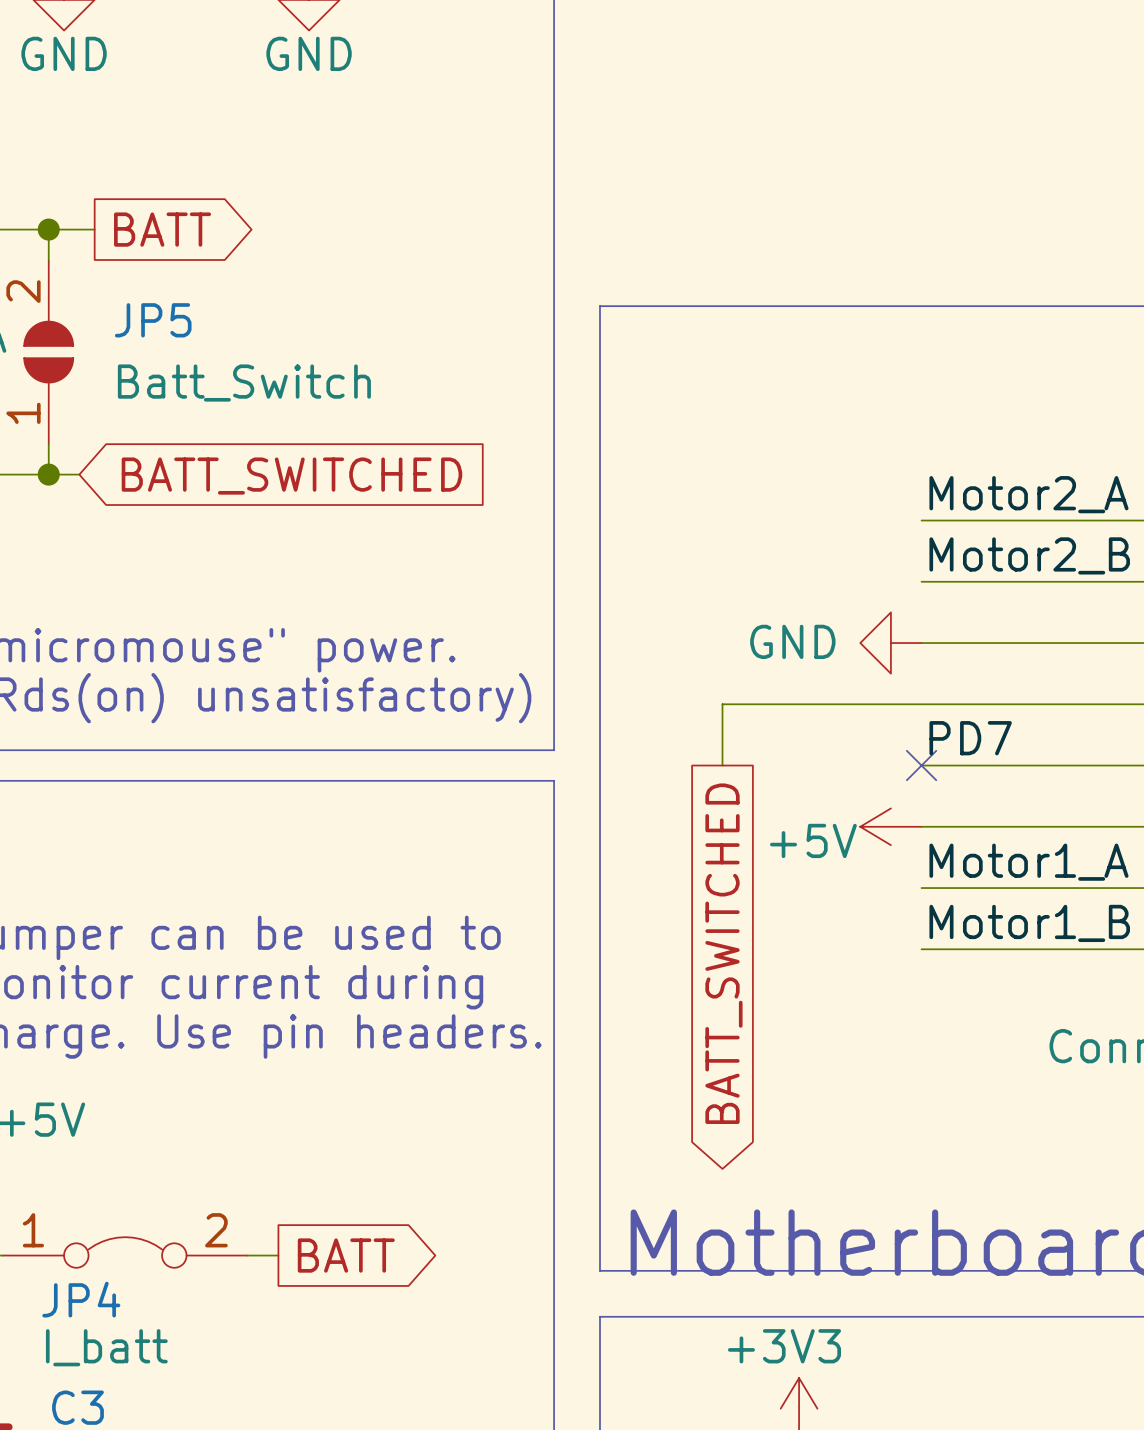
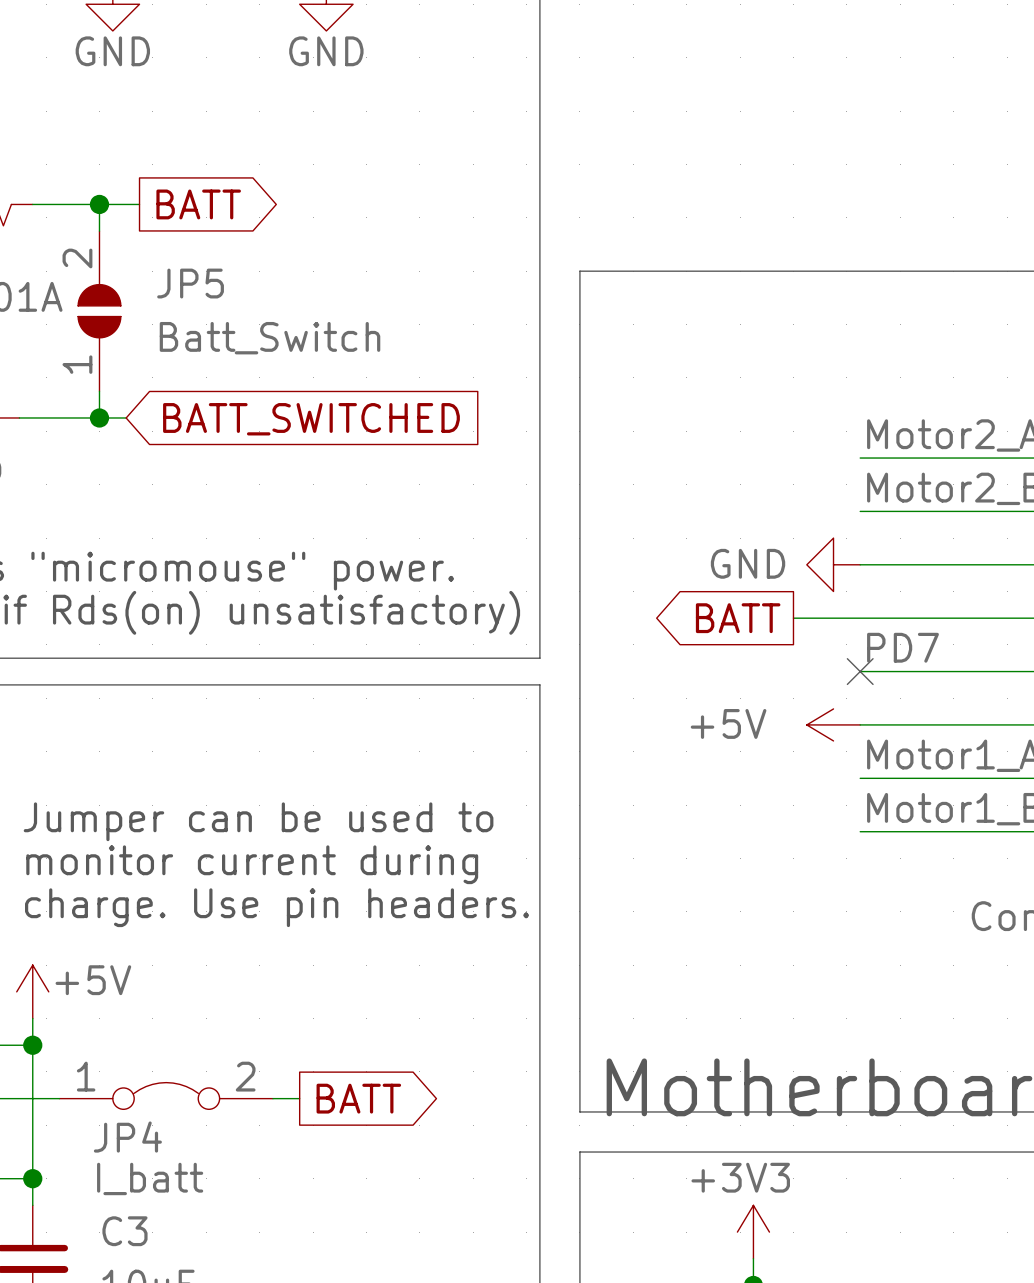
global label: none -> BATT (738, 618)
wire: (845, 704) (722, 704) (722, 765) -> none
power symbol text position: +5V (813, 840) -> +5V (728, 723)
global label: BATT_SWITCHED (723, 953) -> none

